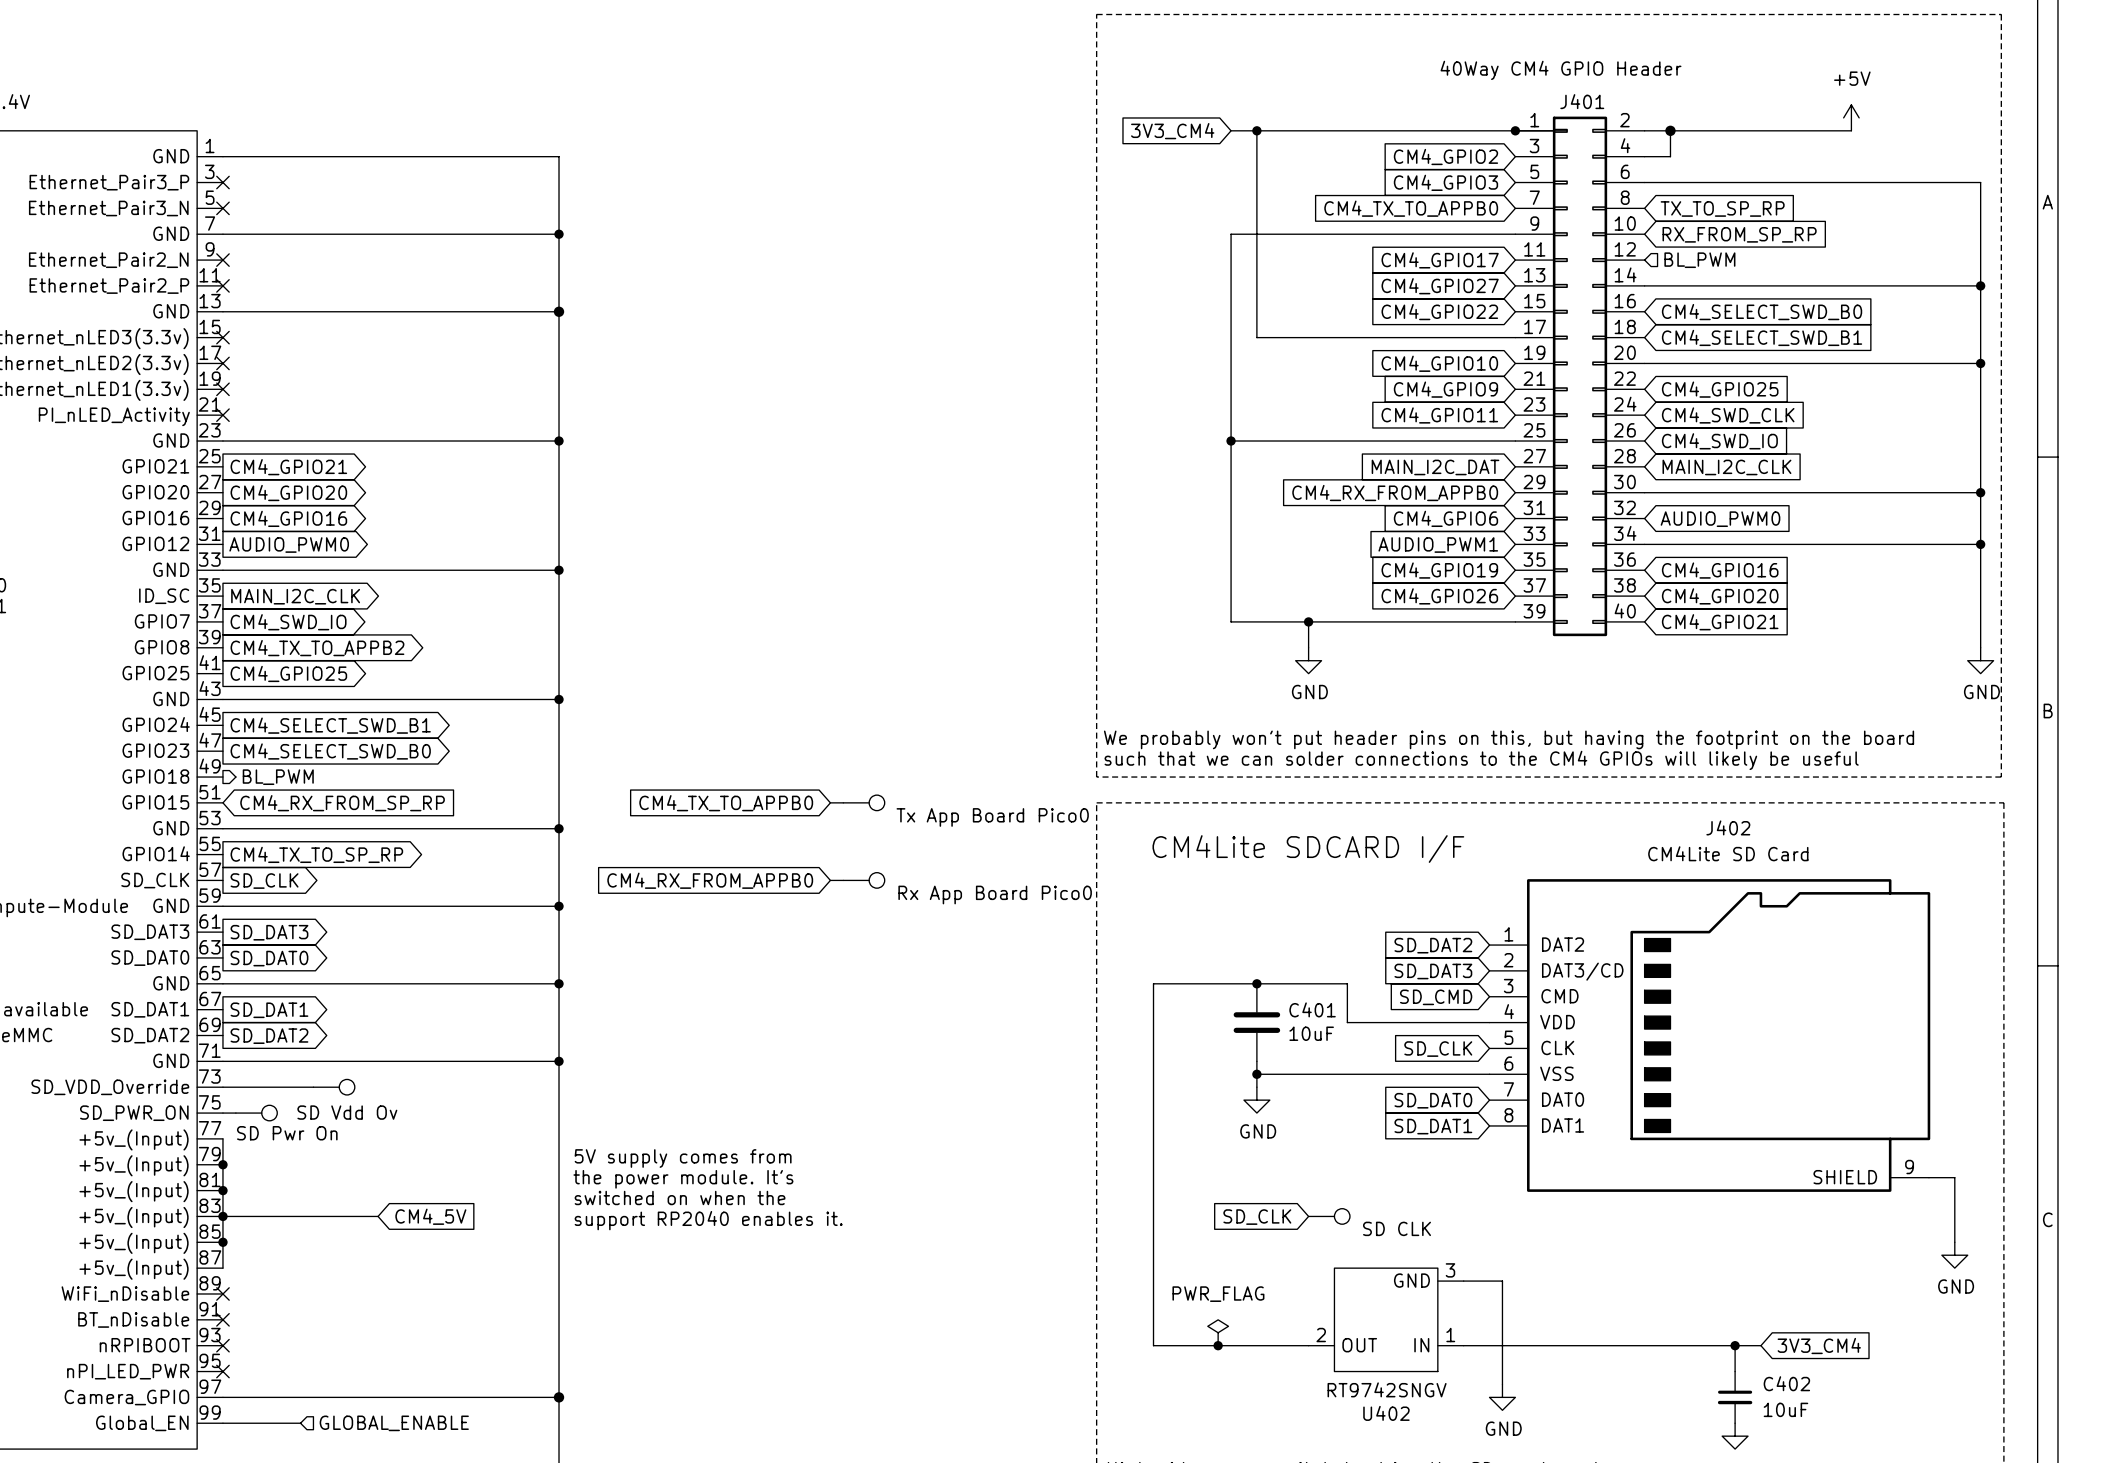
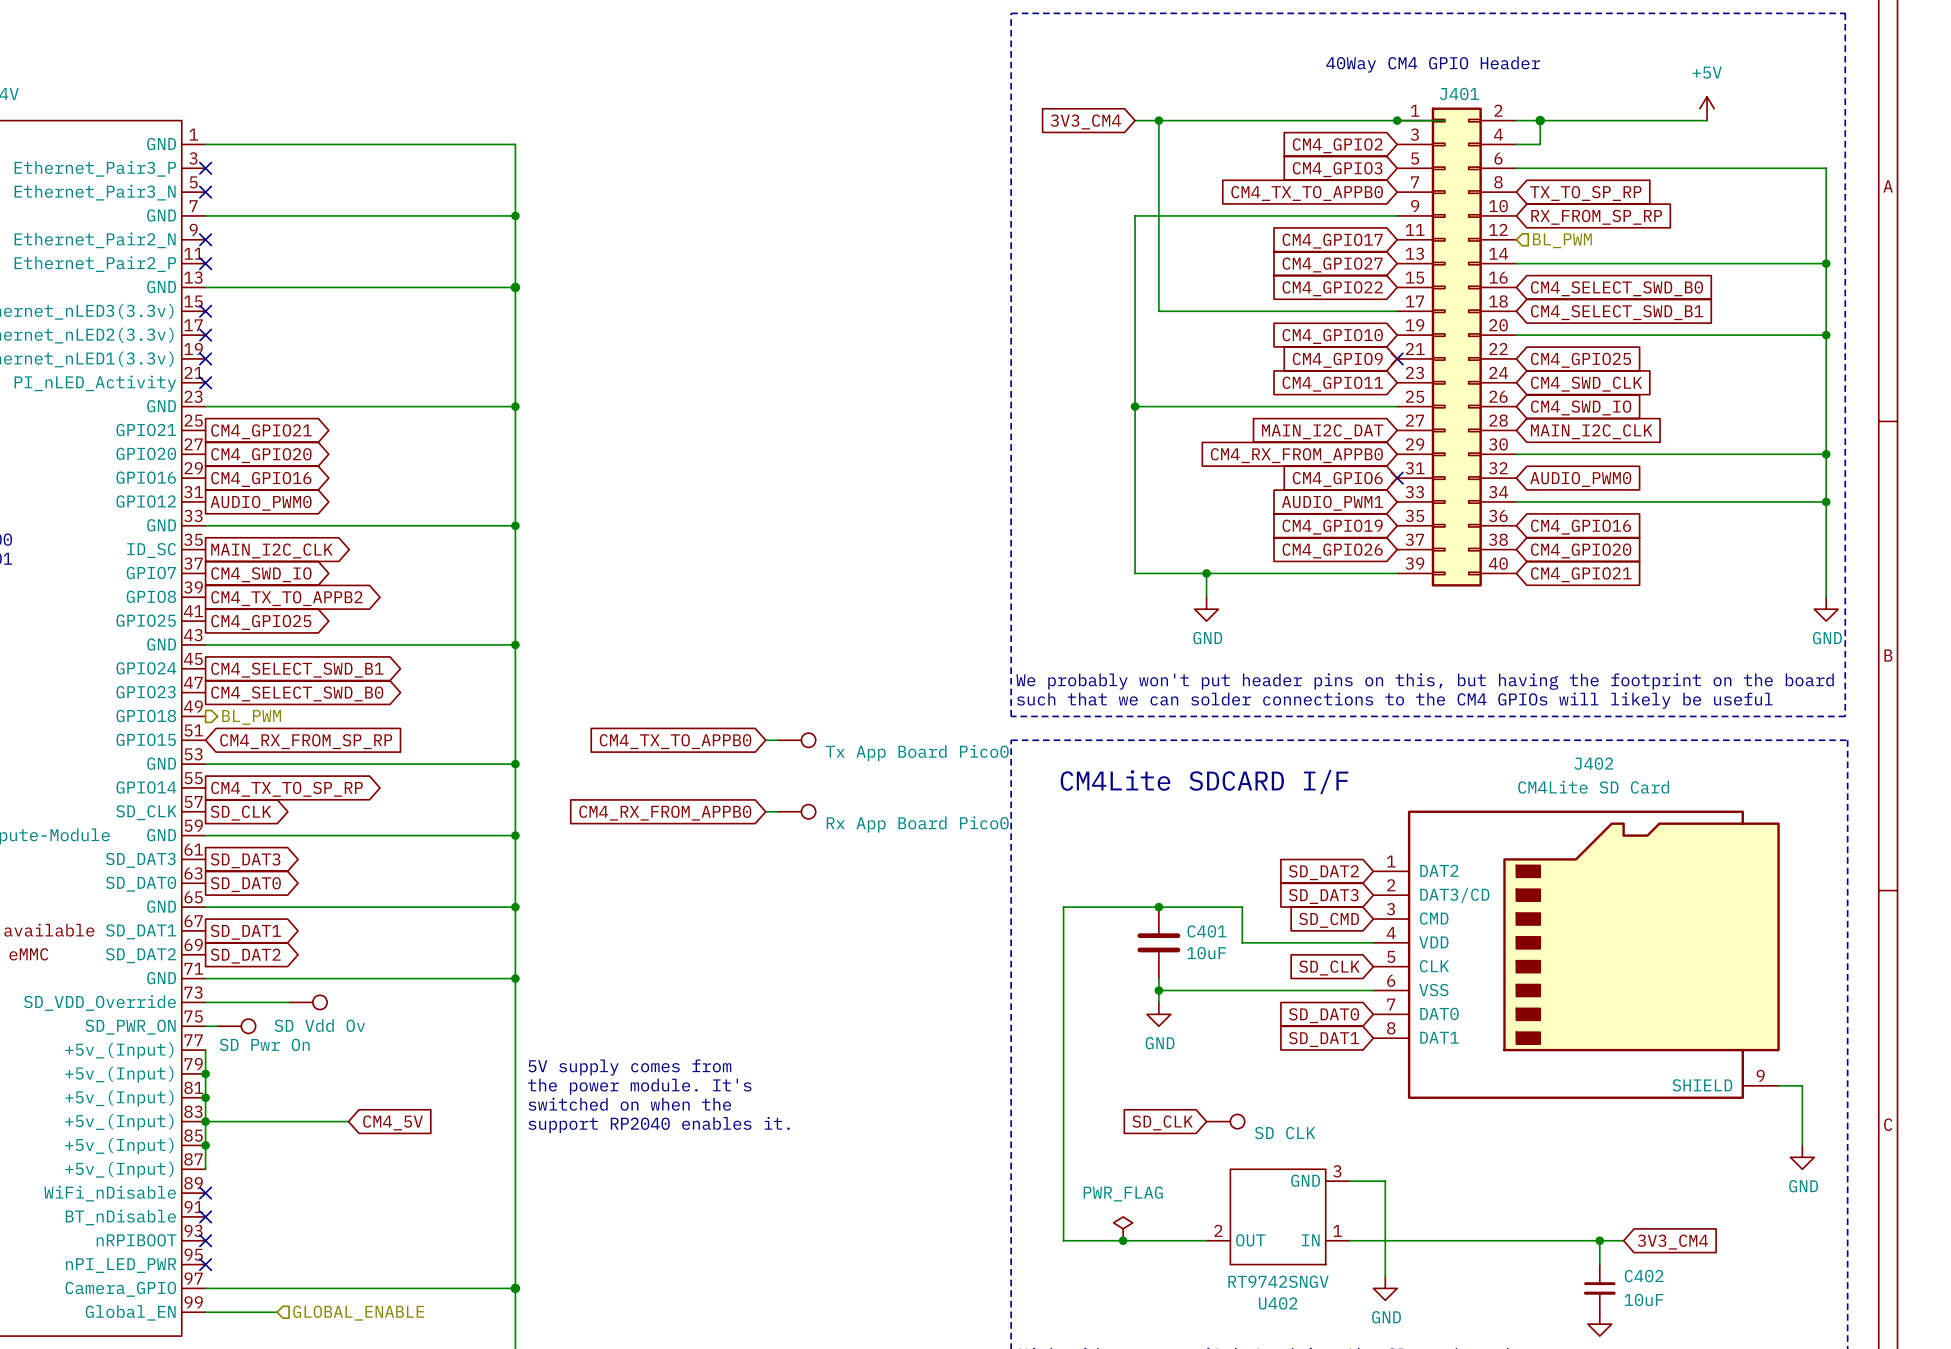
no-connect mark: none -> (1397, 358)
no-connect mark: none -> (1397, 478)

